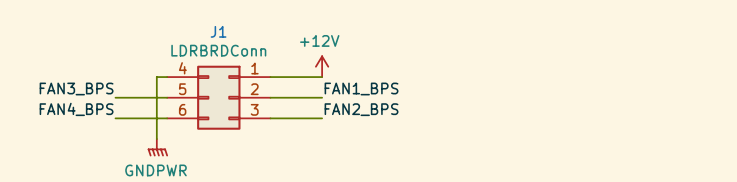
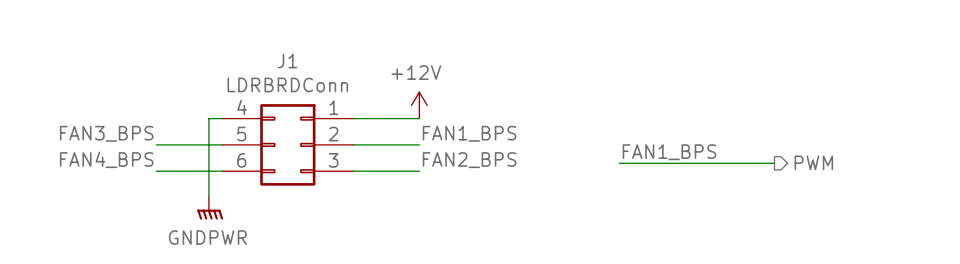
label: none -> FAN1_BPS (669, 152)
sheet pin: none -> PWM (813, 162)
wire: none -> (619, 163) (774, 163)

